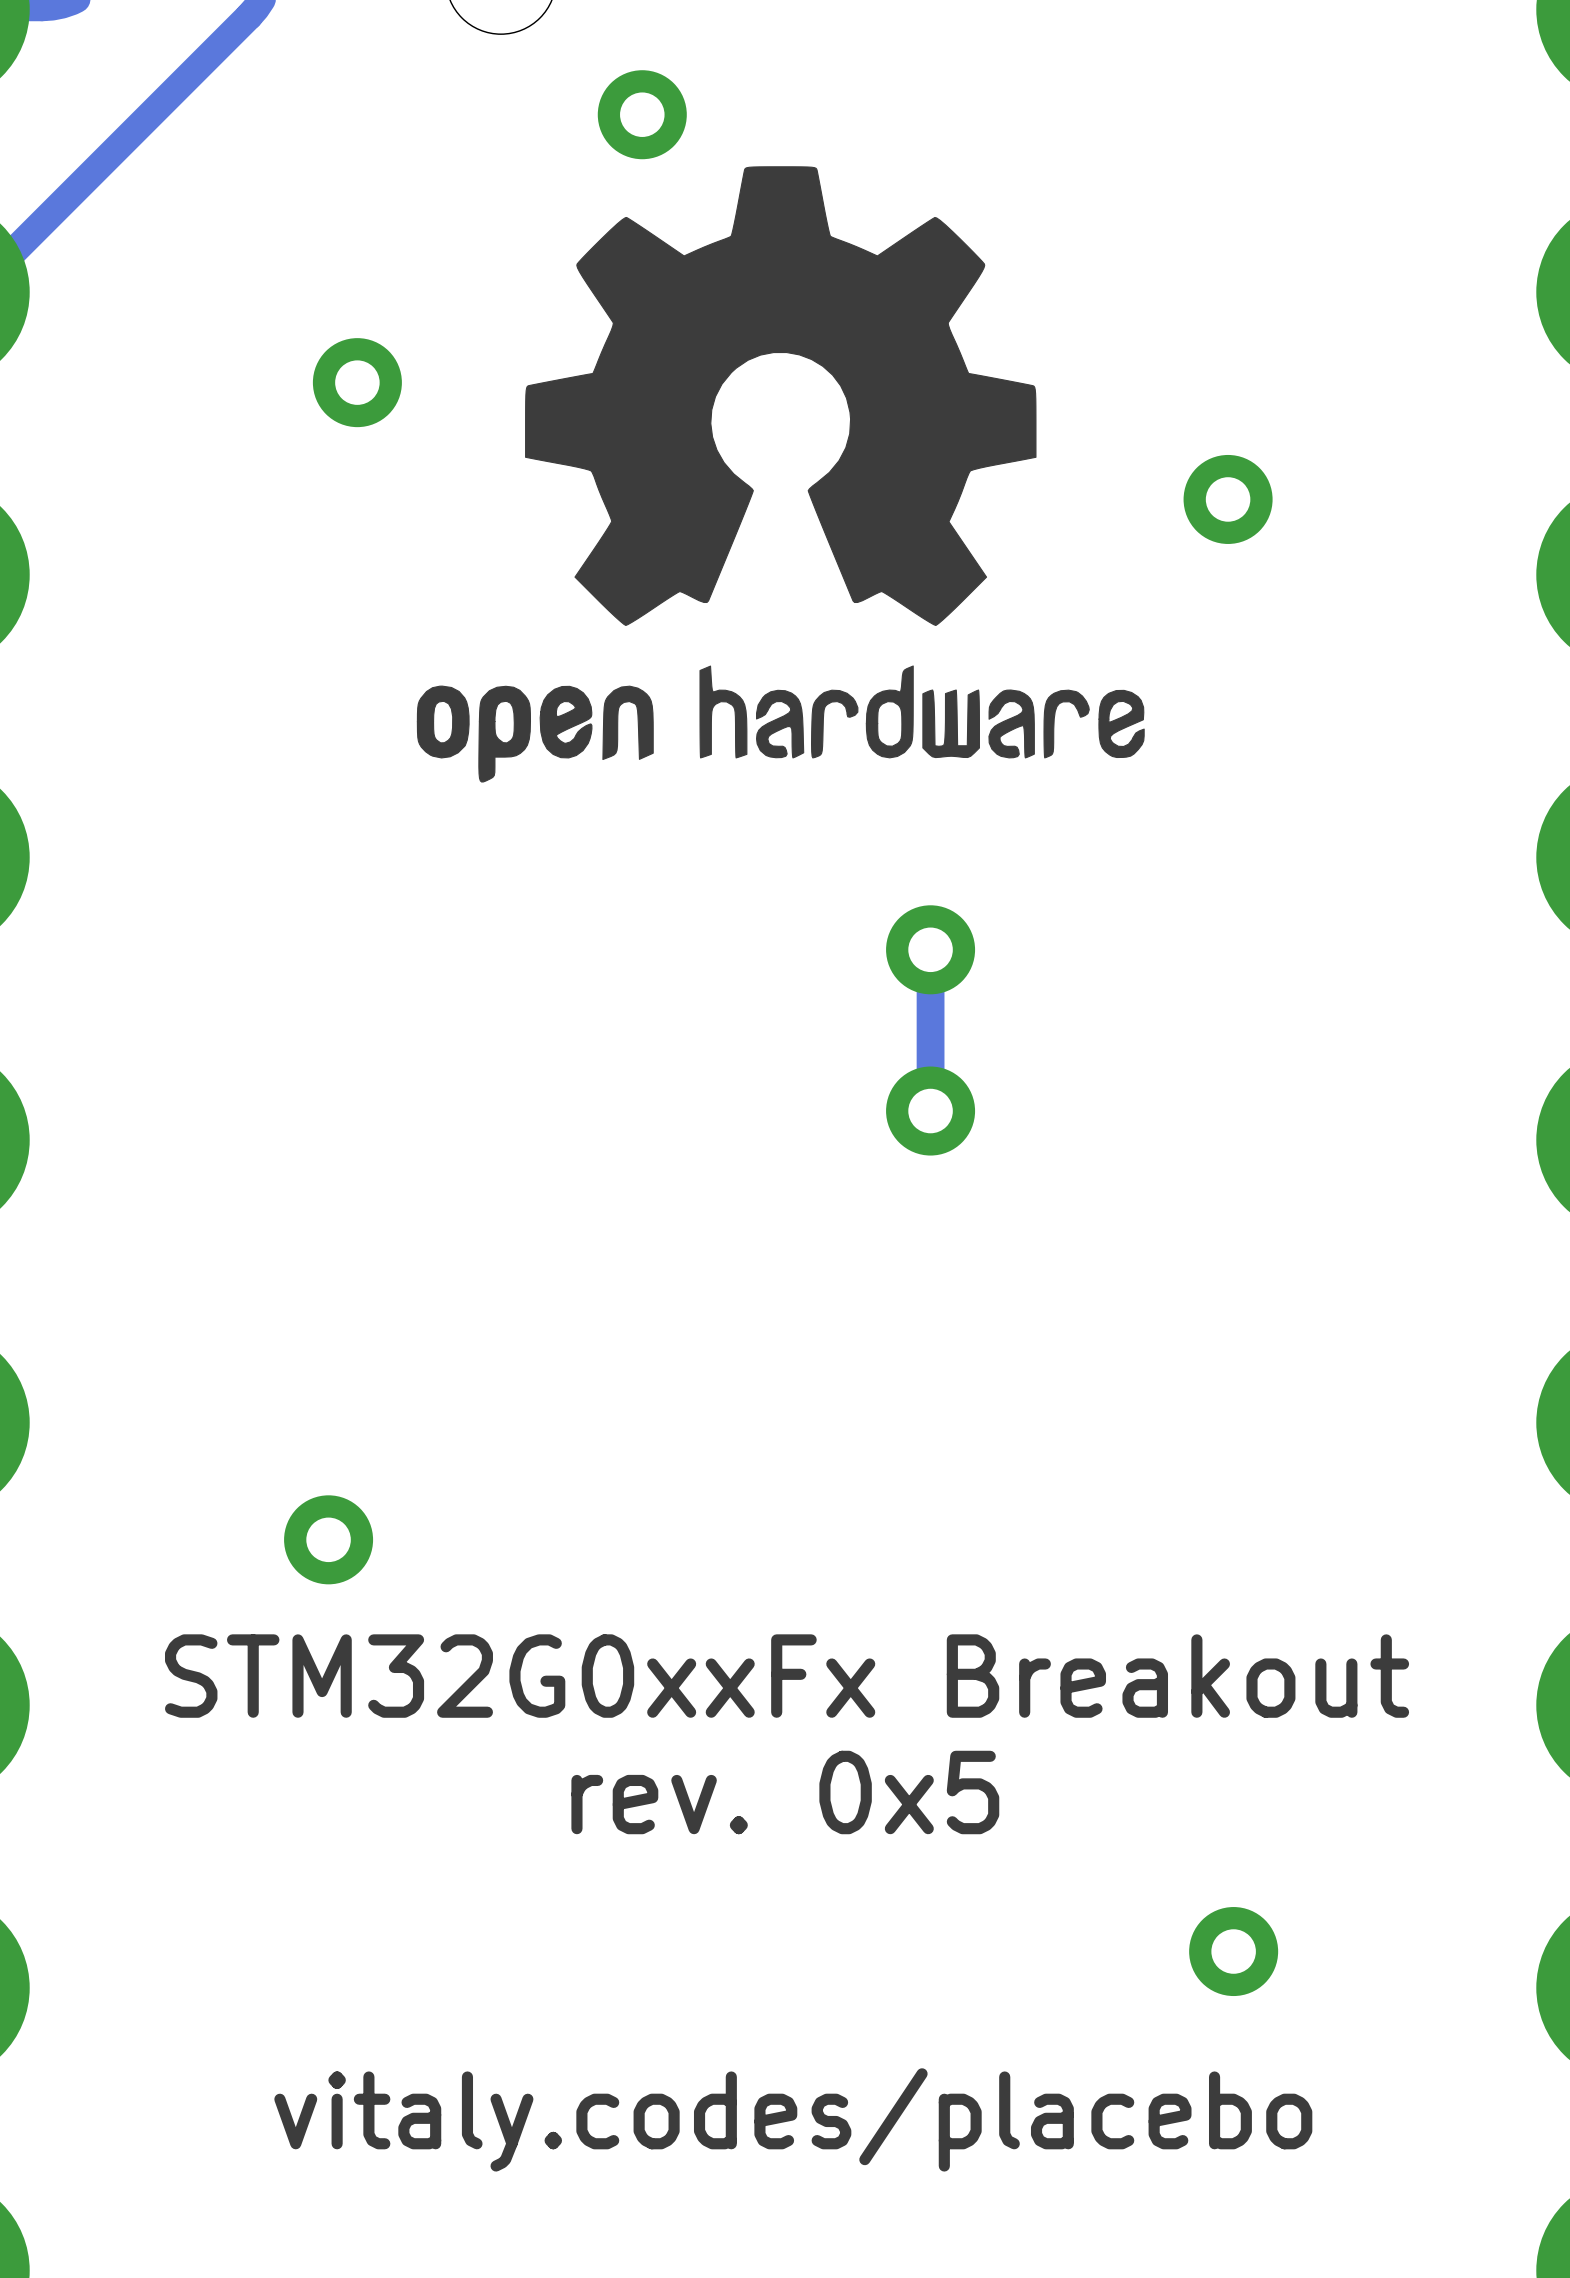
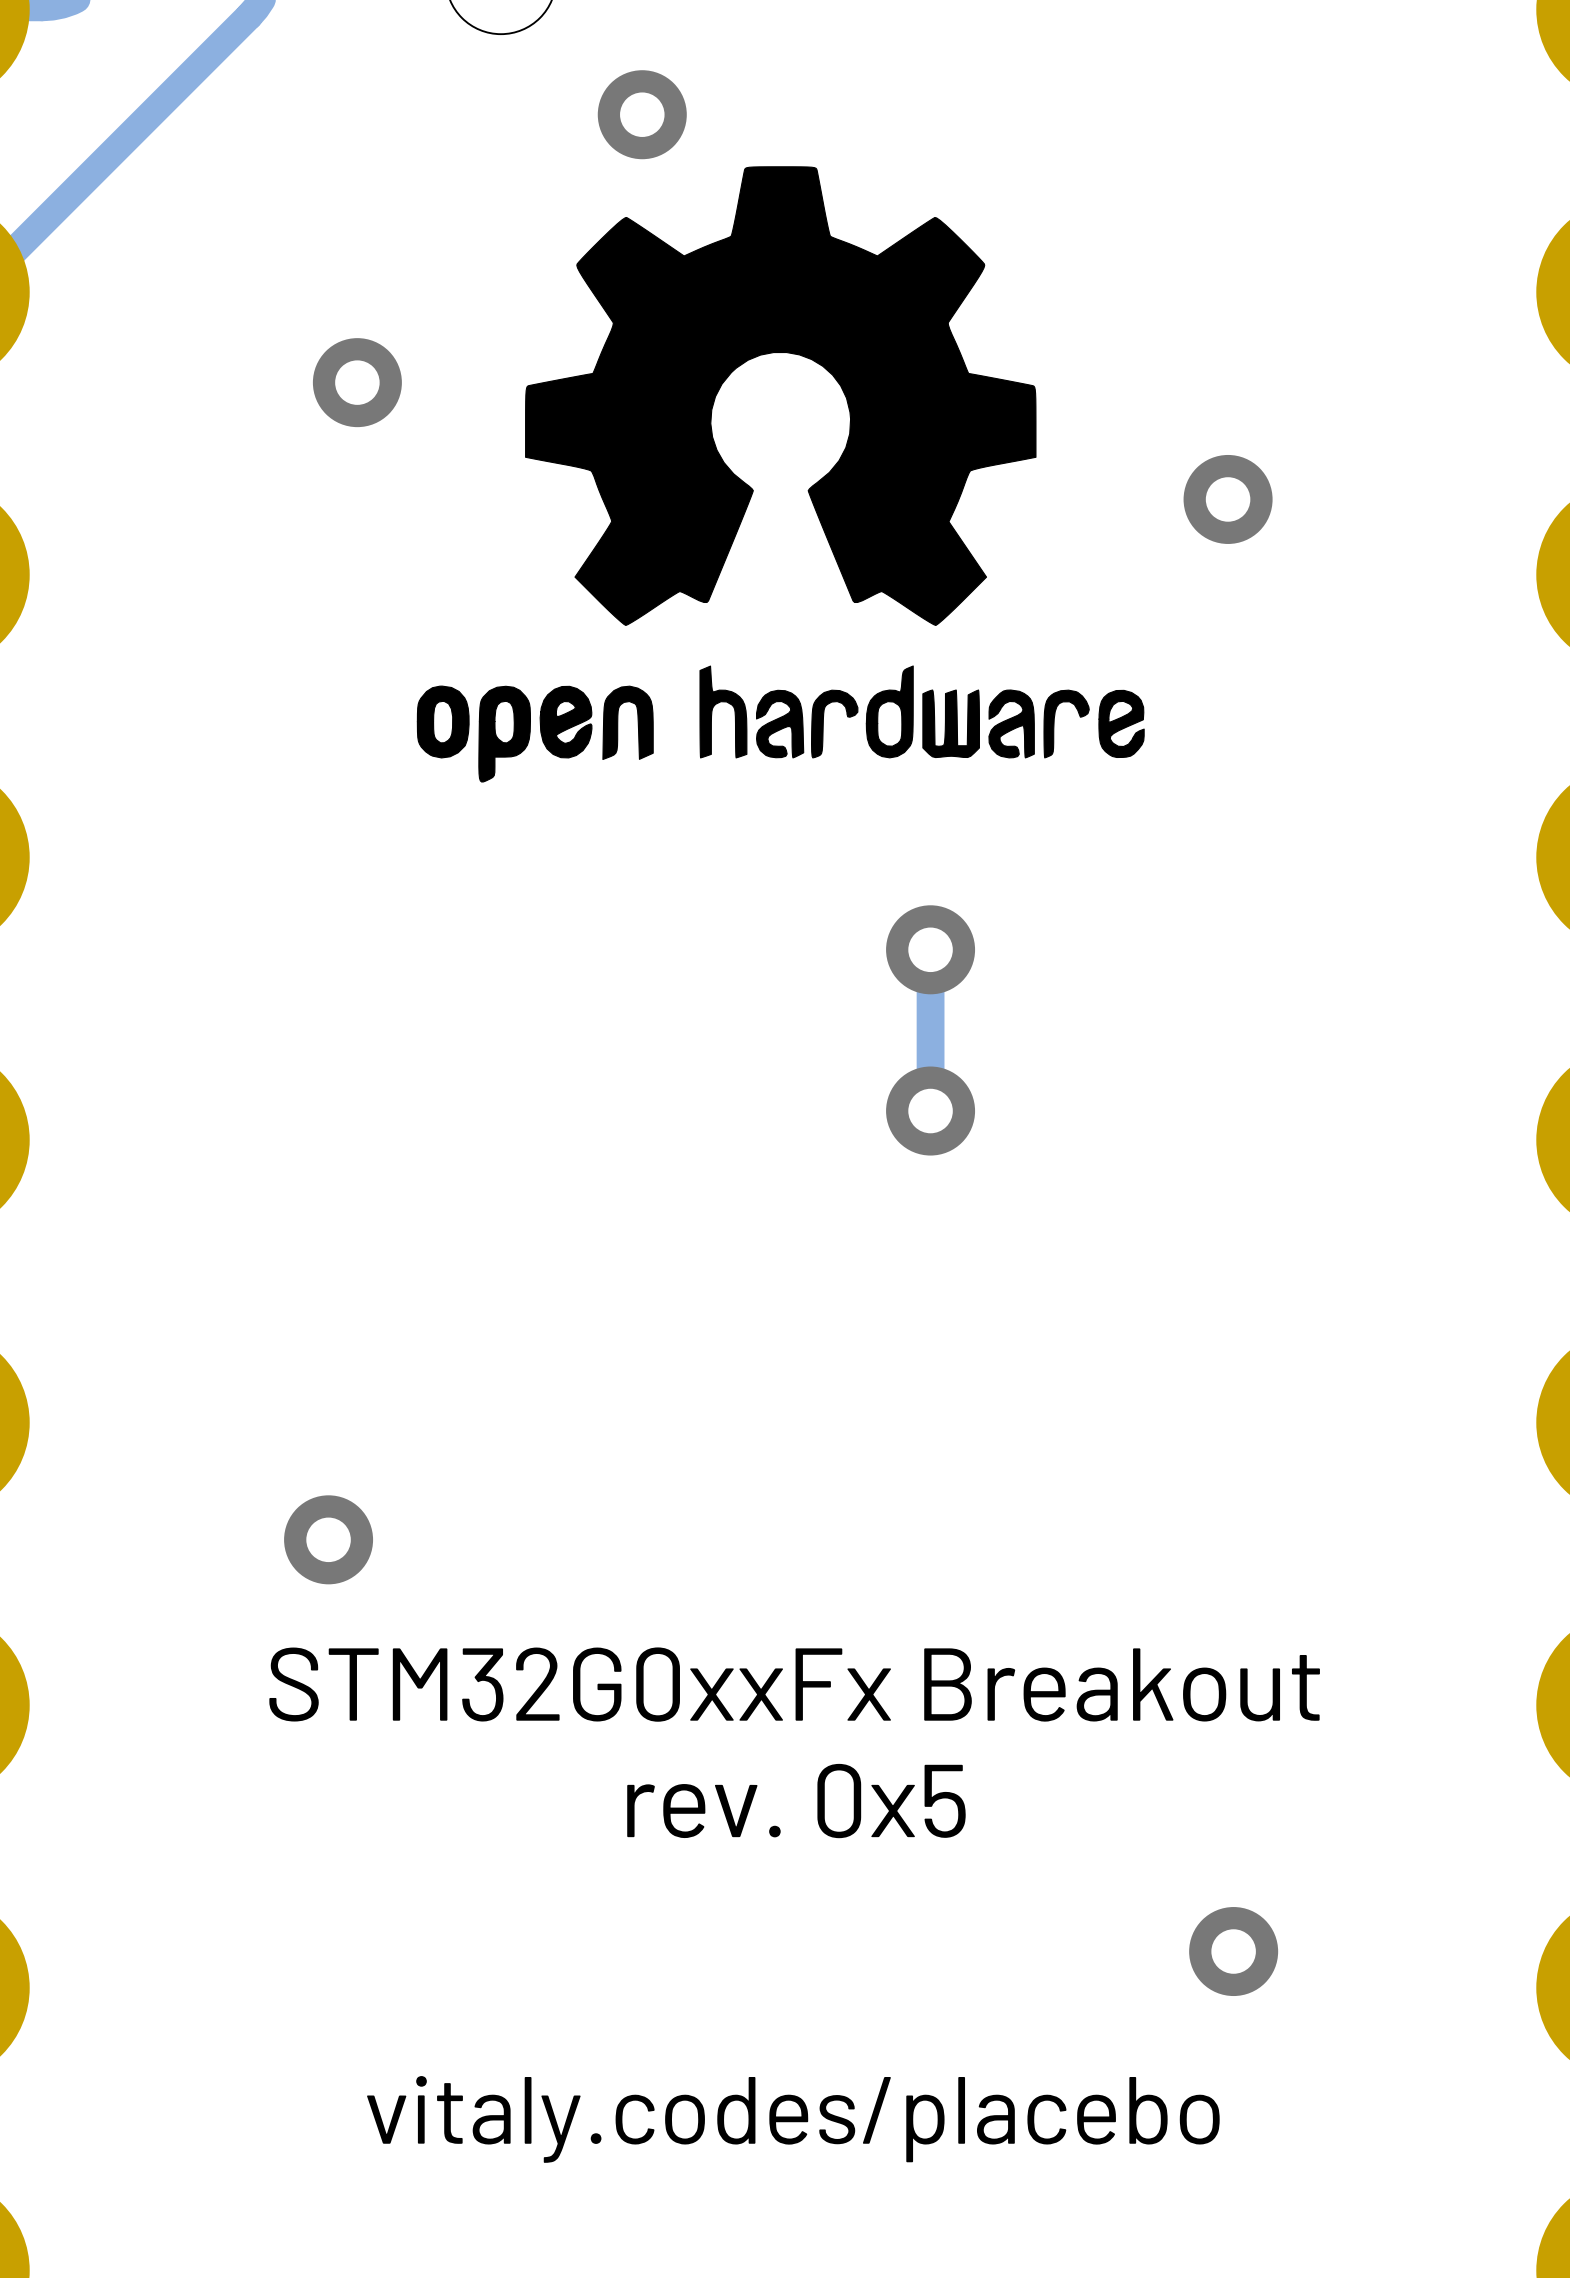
text position: STM32G0xxFx Breakout (787, 1676) -> STM32G0xxFx Breakout (794, 1684)
text position: rev. 0x5 (785, 1792) -> rev. 0x5 (796, 1801)

